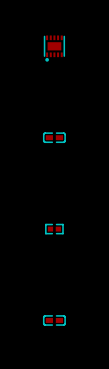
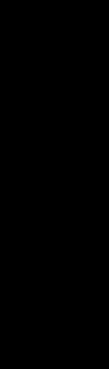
part: (54, 48) -> none
part: (54, 137) -> none
part: (54, 229) -> none
part: (54, 320) -> none

